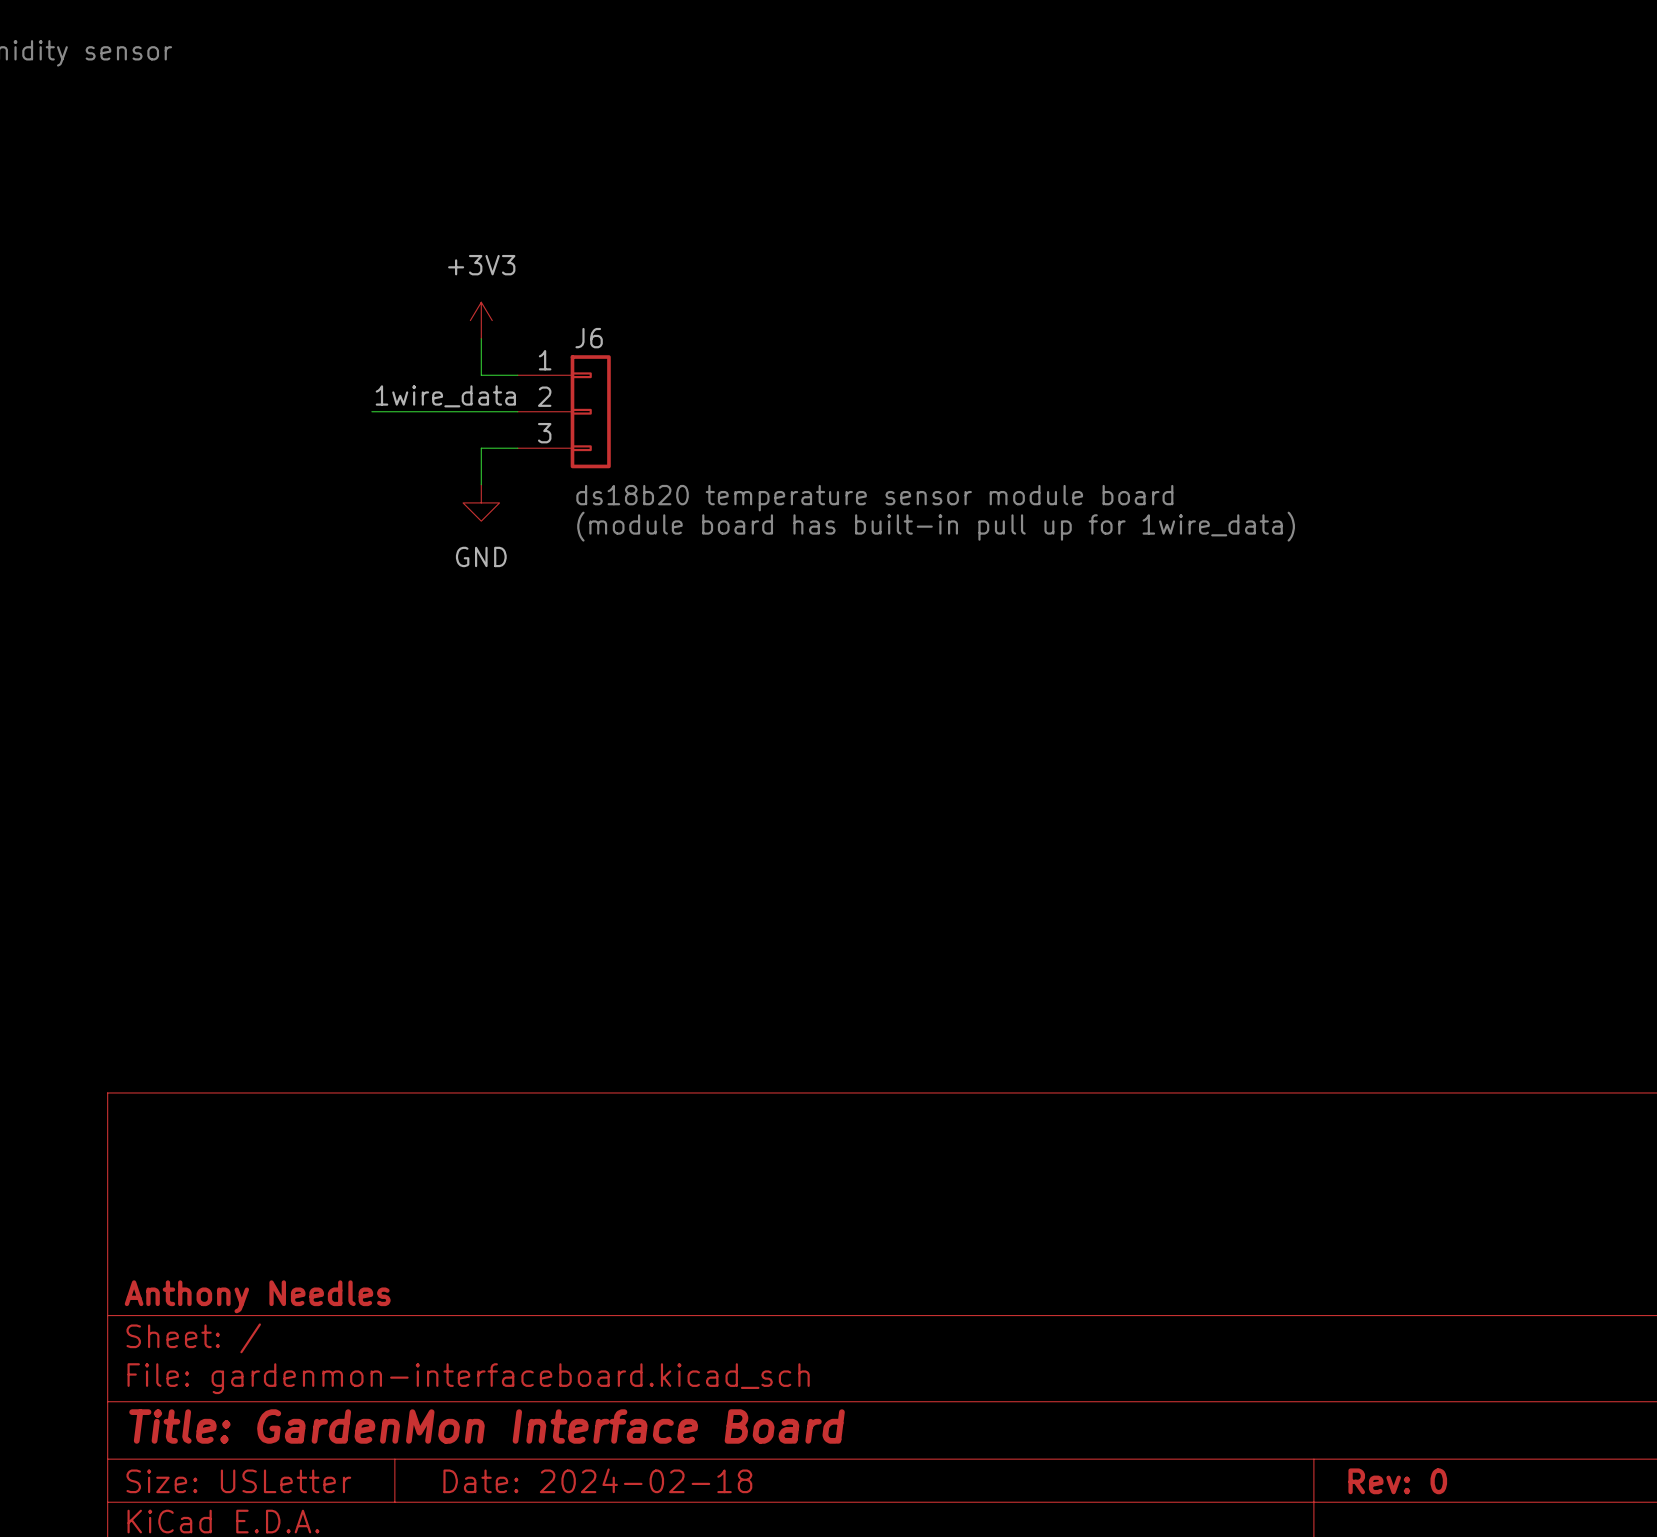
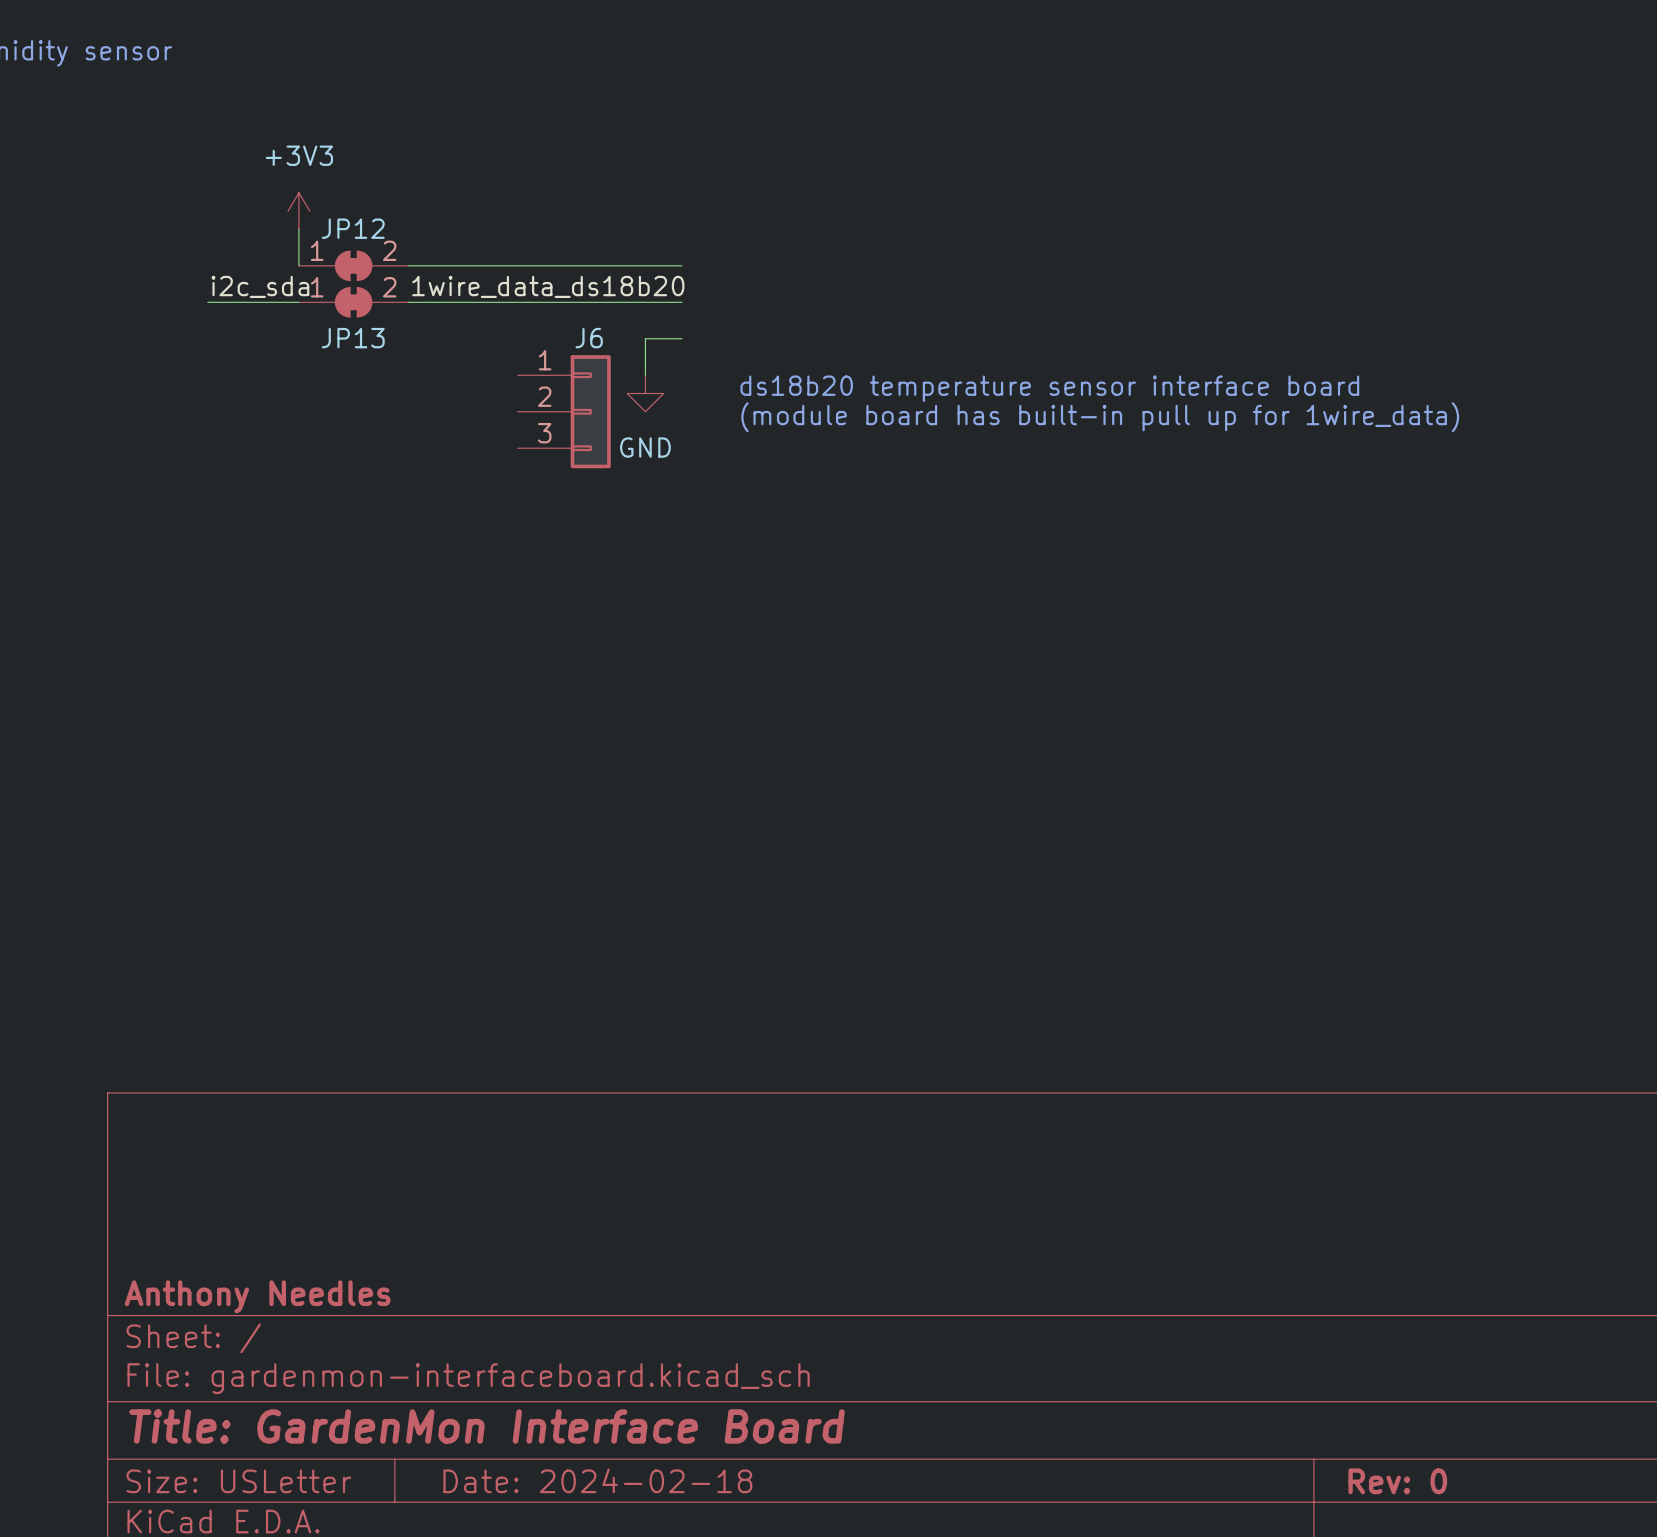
wire: none -> (298, 229) (298, 265)
JP12: none -> (353, 265)
wire: none -> (408, 265) (681, 265)
label: none -> i2c_sda (260, 286)
label: none -> 1wire_data_ds18b20 (548, 286)
wire: none -> (207, 302) (298, 302)
JP13: none -> (353, 302)
wire: none -> (408, 302) (681, 302)
power symbol position: +3V3 (481, 320) -> +3V3 (298, 211)
wire: (481, 338) (481, 375) (517, 375) -> none
text: none -> ds18b20 temperature sensor interface board (1049, 388)
label: 1wire_data (445, 396) -> none
wire: (371, 411) (517, 411) -> none
wire: (517, 448) (481, 448) (481, 484) -> (681, 338) (645, 338) (645, 375)
text: ds18b20 temperature sensor module board (874, 498) -> none
power symbol position: GND (481, 502) -> GND (645, 393)
text position: (module board has built-in pull up for 1wire_data) (936, 526) -> (module board has built-in pull up for 1wire_data) (1100, 417)

